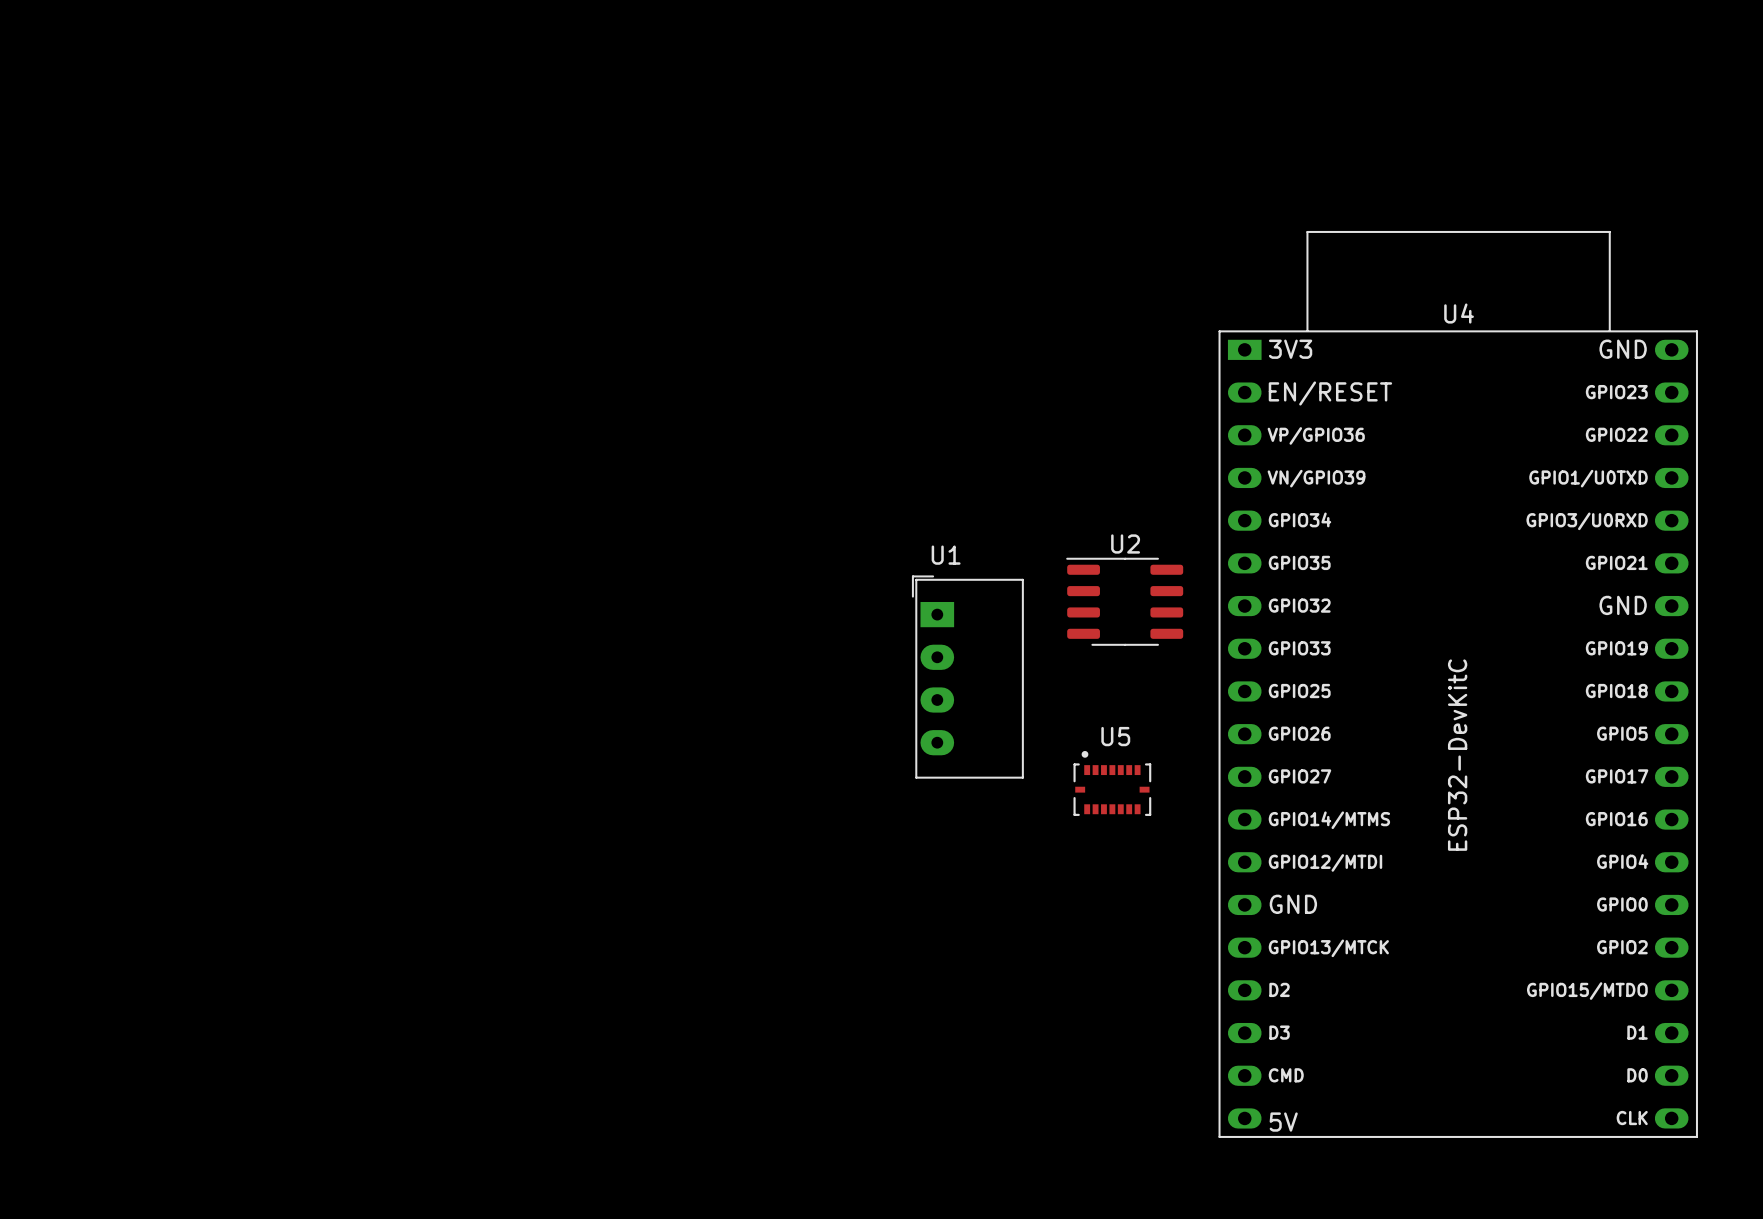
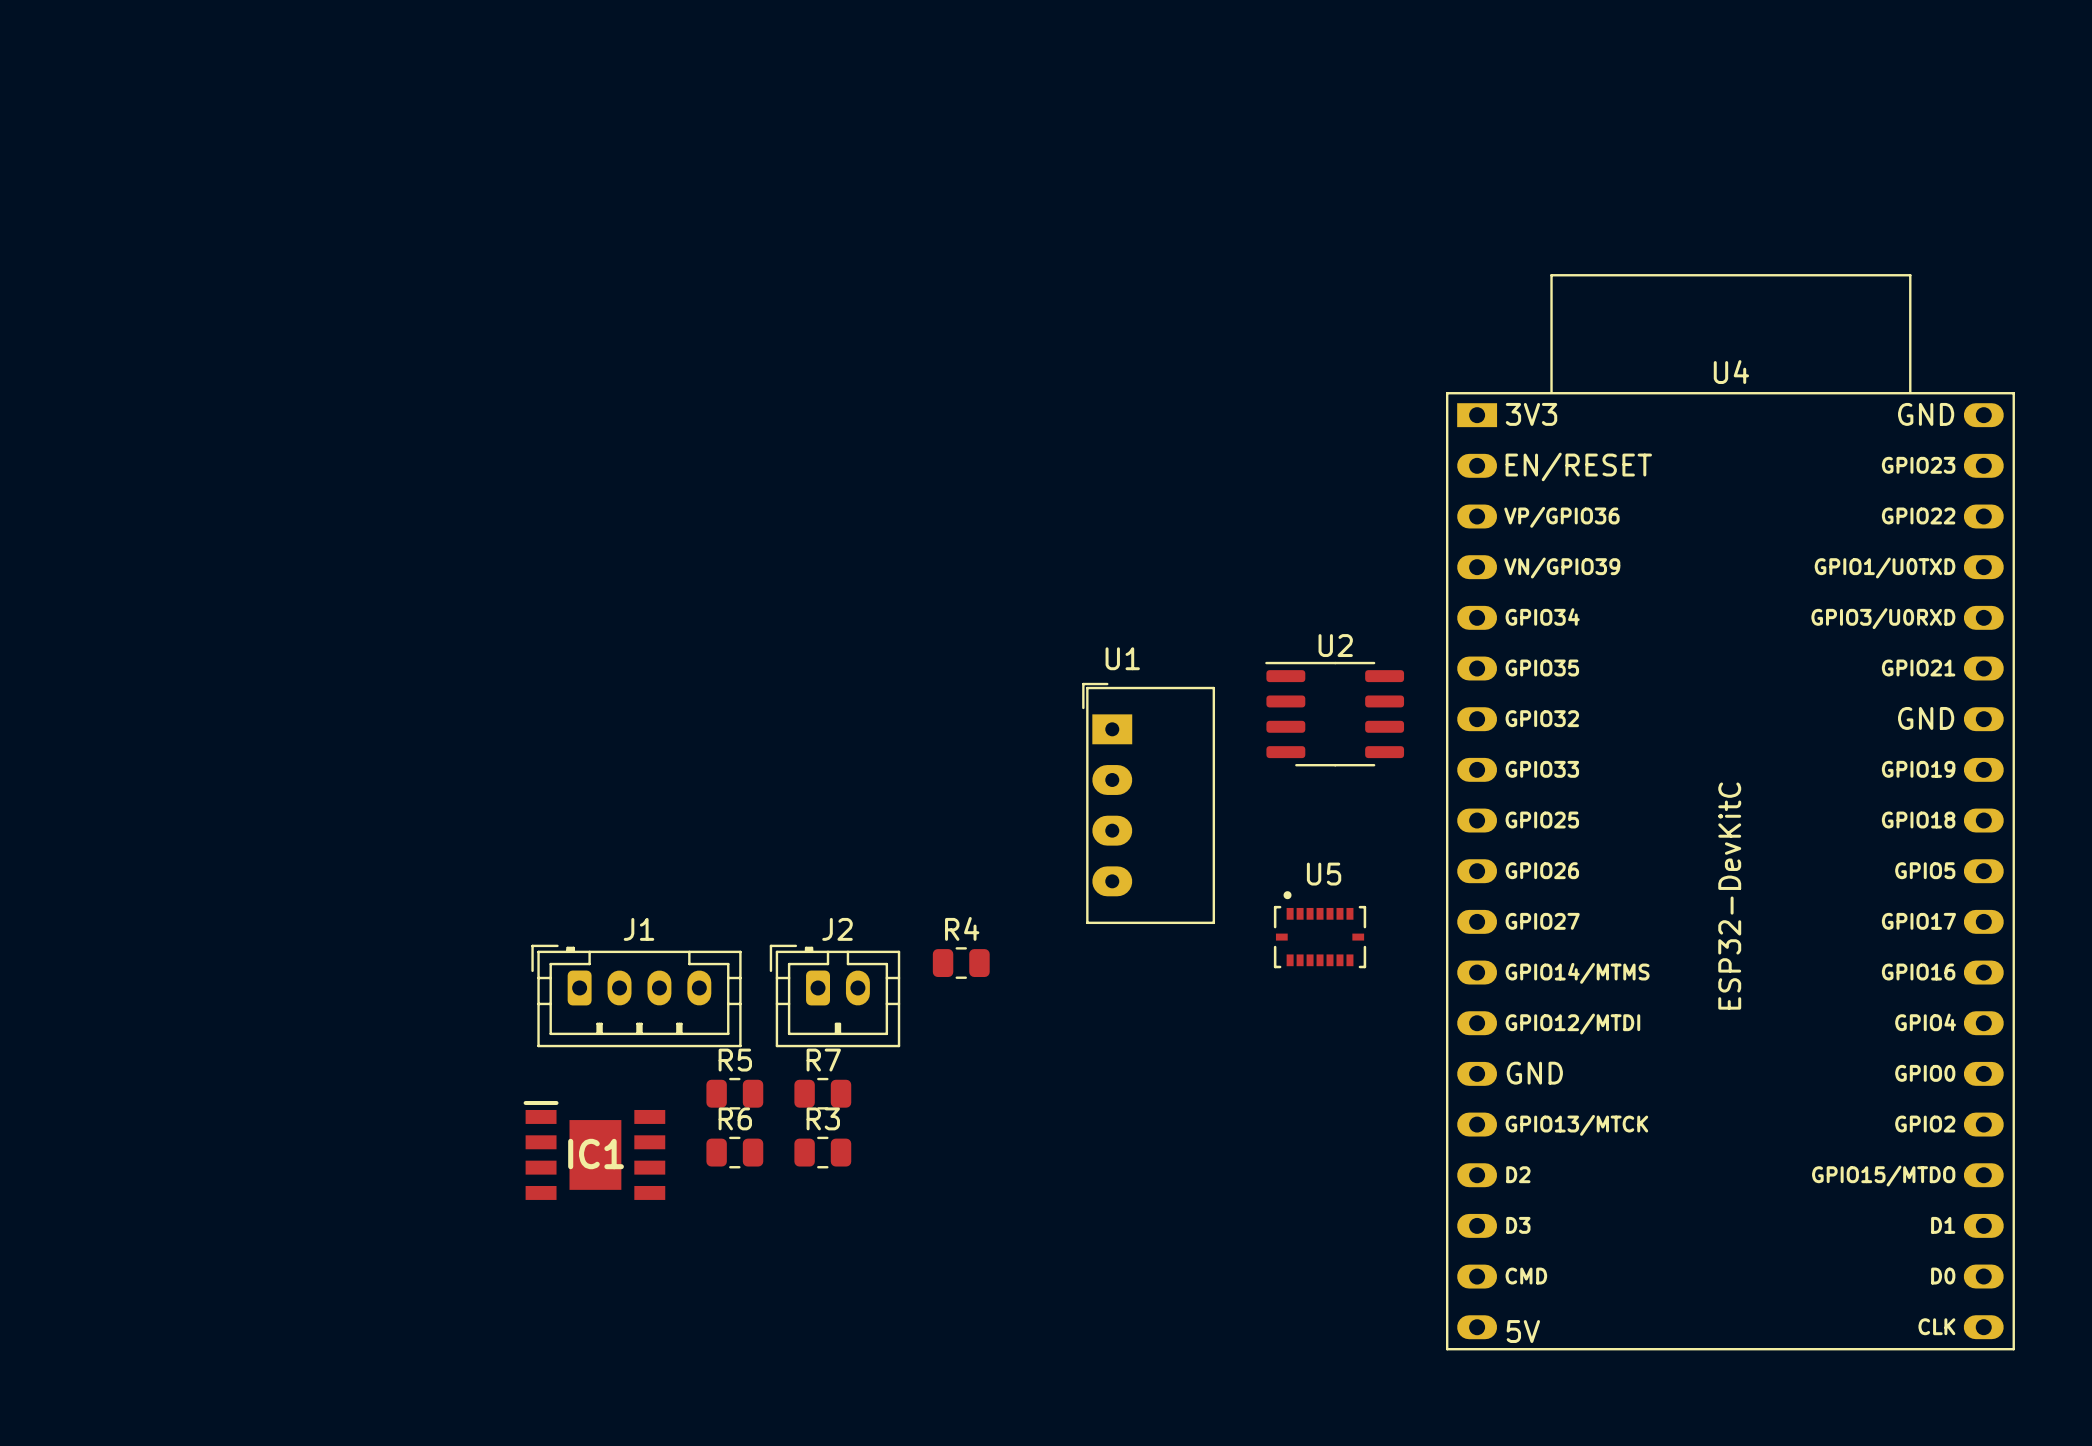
R4: none -> (961, 963)
J1: none -> (636, 995)
J2: none -> (834, 995)
R5: none -> (734, 1093)
R7: none -> (822, 1093)
IC1: none -> (594, 1150)
R6: none -> (734, 1152)
R3: none -> (822, 1152)

